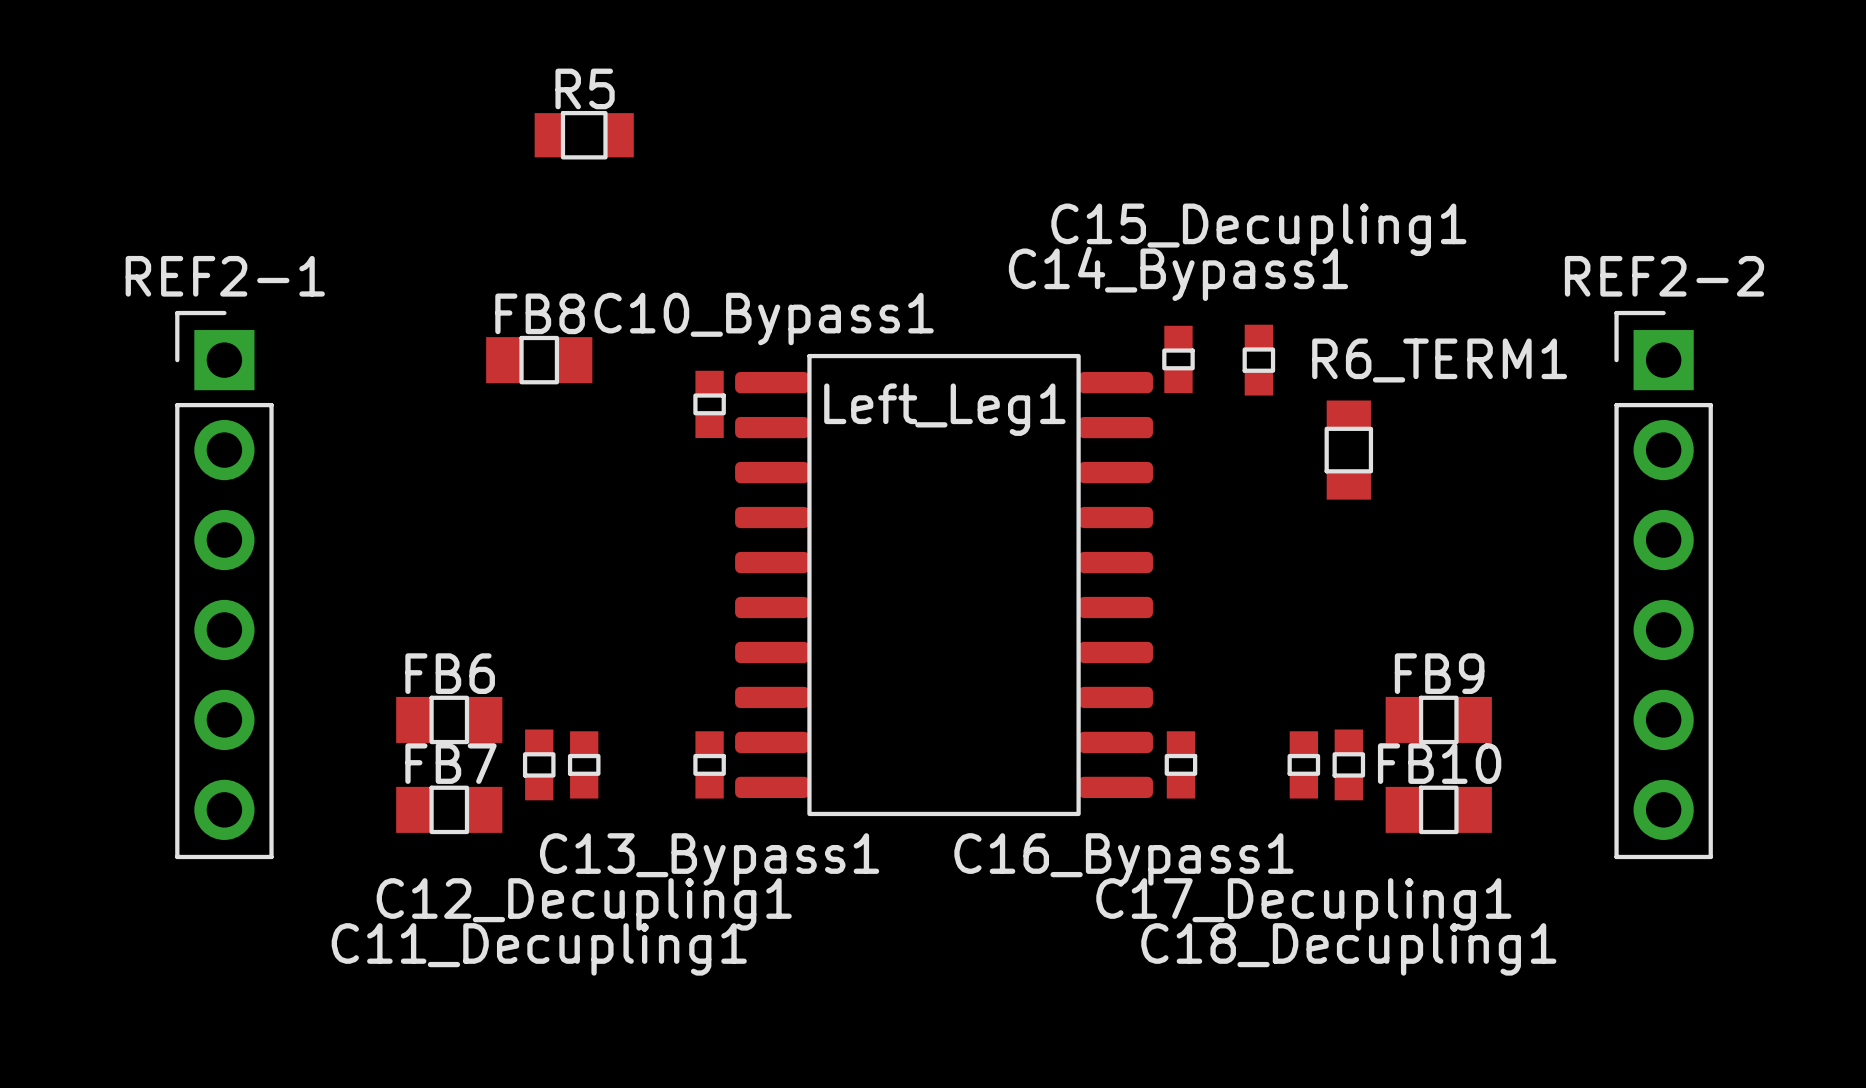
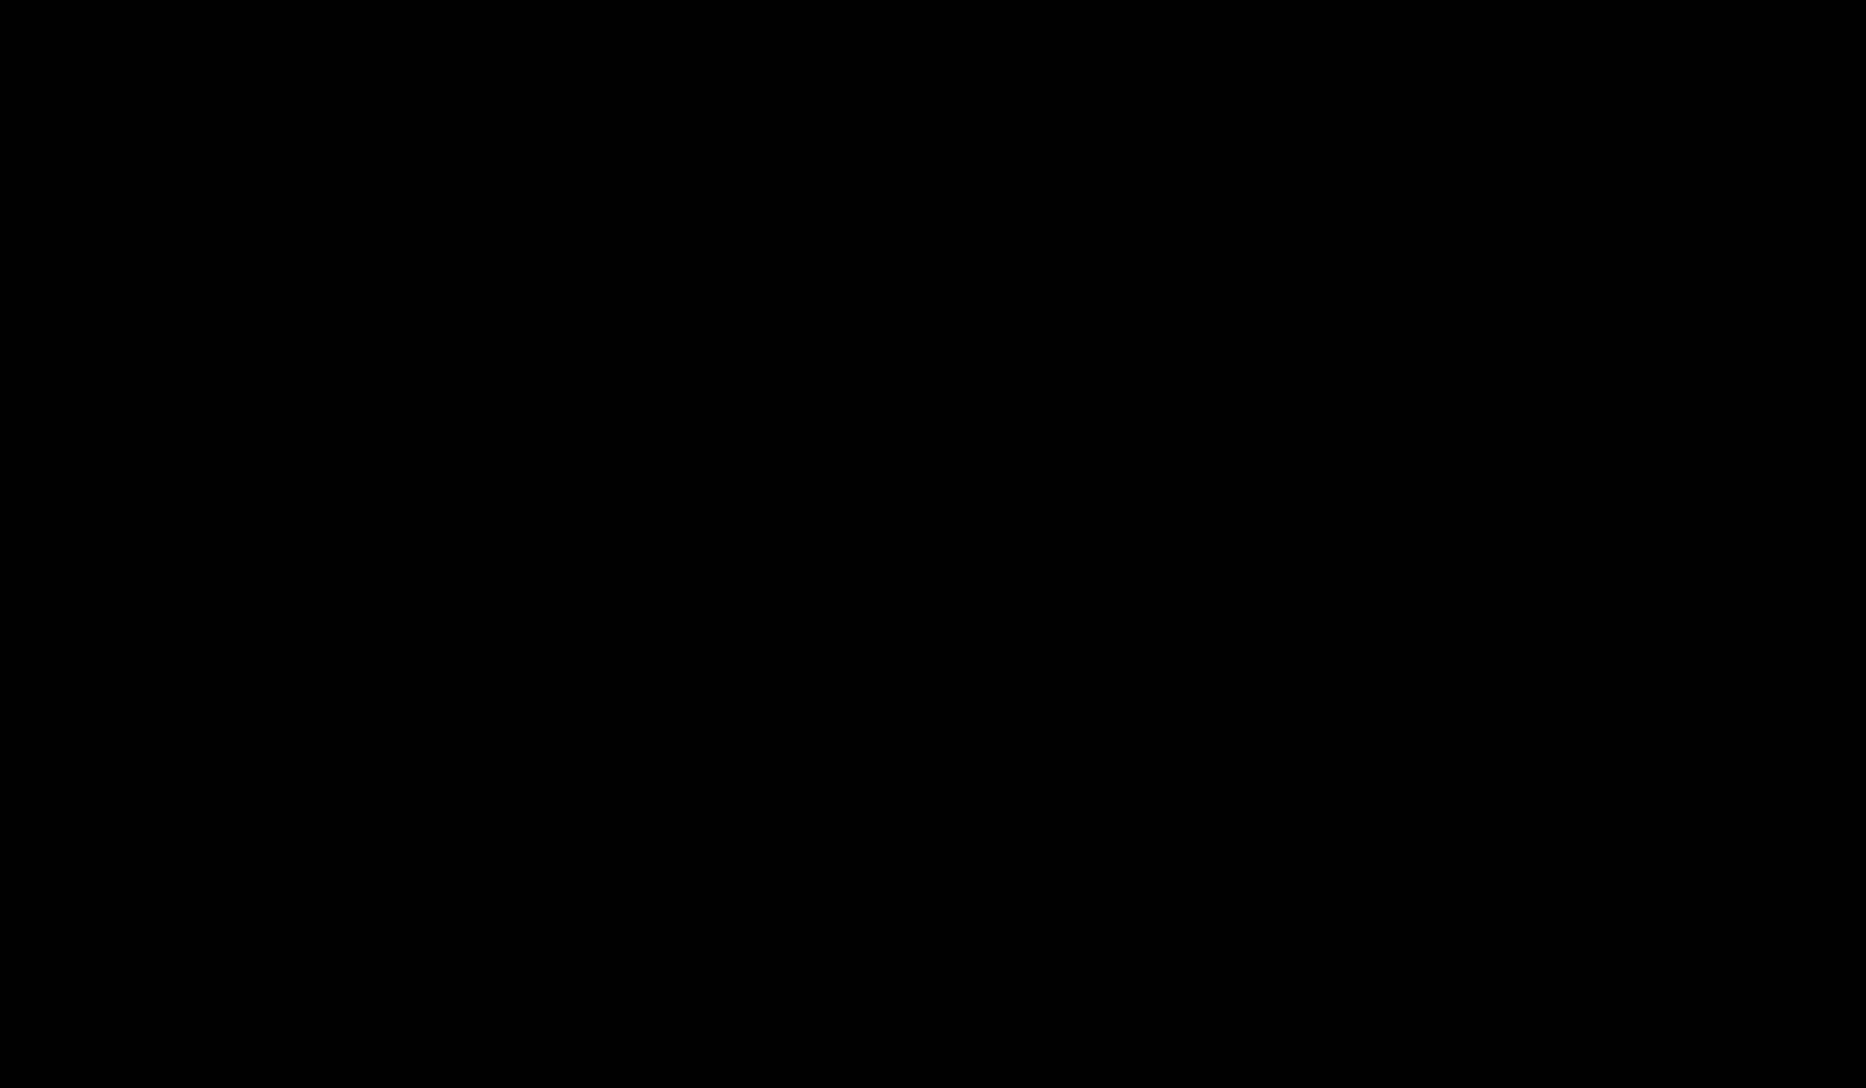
R5: (584, 135) -> none
C14_Bypass1: (1178, 359) -> none
FB8: (539, 360) -> none
C15_Decupling1: (1258, 360) -> none
C10_Bypass1: (709, 404) -> none
R6_TERM1: (1348, 450) -> none
REF2-1: (224, 585) -> none
Left_Leg1: (944, 585) -> none
REF2-2: (1663, 585) -> none
FB6: (449, 719) -> none
FB9: (1438, 719) -> none
C11_Decupling1: (539, 764) -> none
C12_Decupling1: (584, 764) -> none
C13_Bypass1: (709, 764) -> none
C16_Bypass1: (1180, 764) -> none
C17_Decupling1: (1303, 764) -> none
C18_Decupling1: (1348, 764) -> none
FB7: (449, 809) -> none
FB10: (1438, 809) -> none

